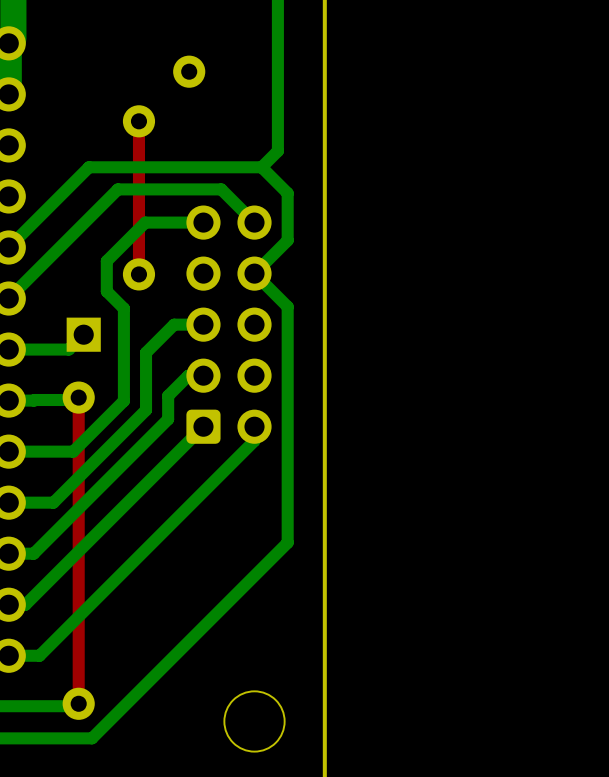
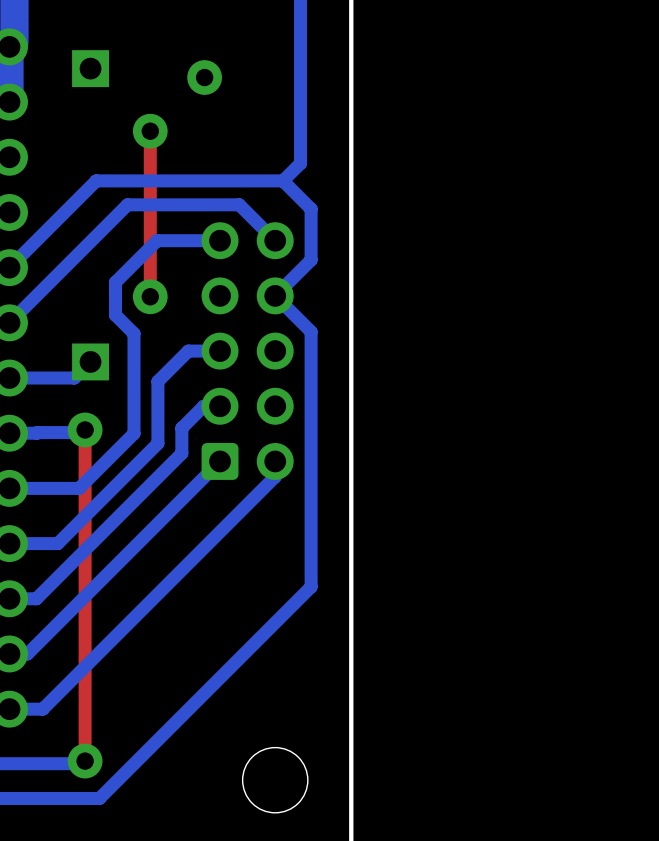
part: none -> (90, 68)

